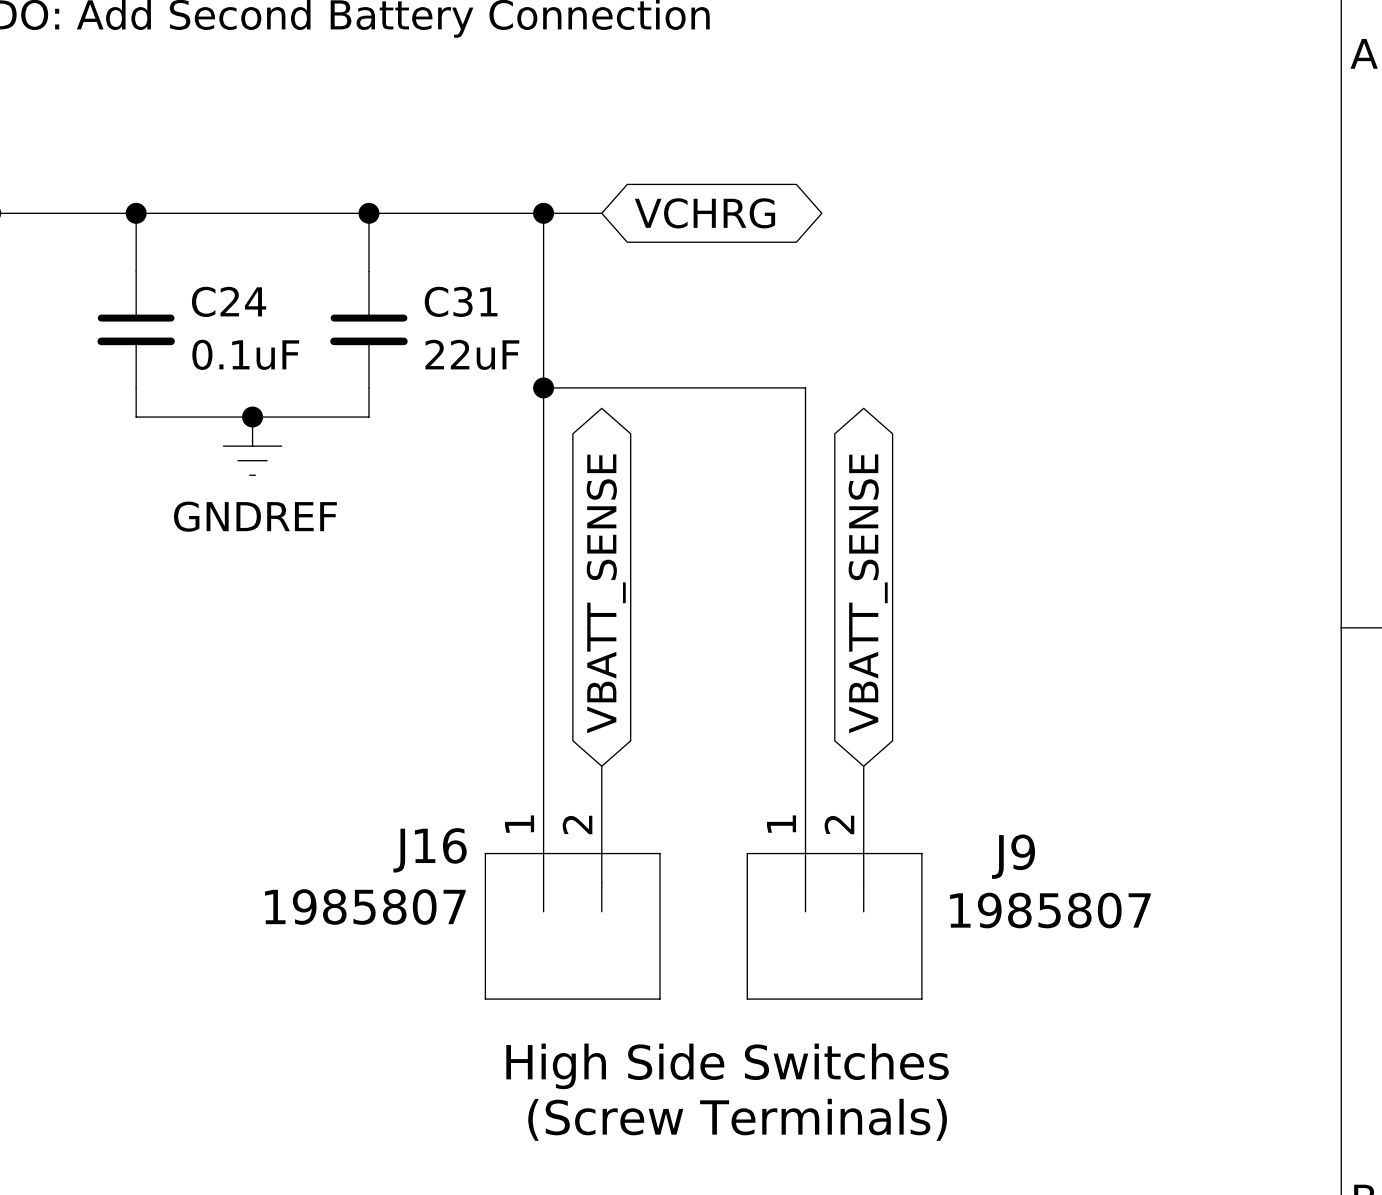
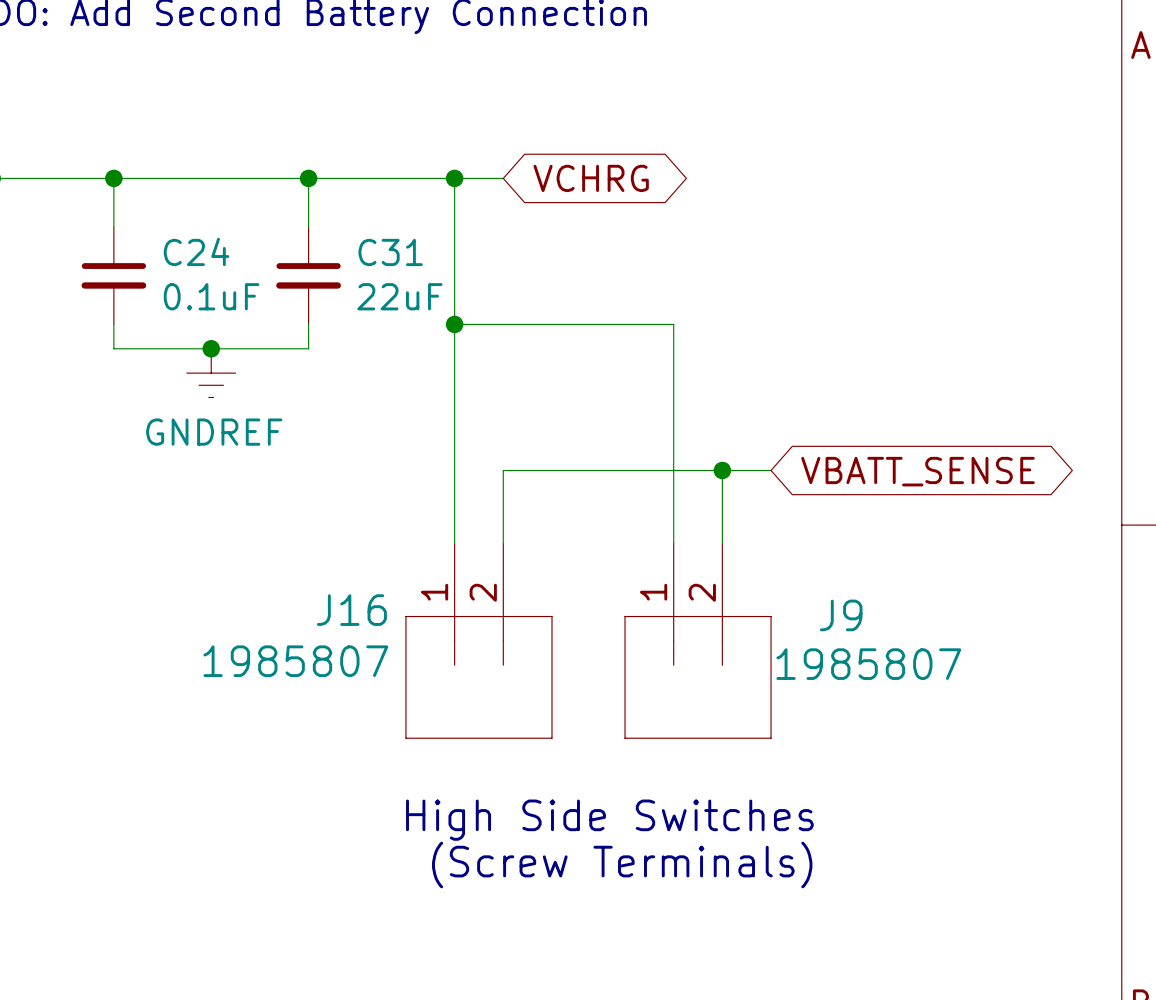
wire: none -> (722, 470) (722, 543)
junction: none -> (722, 470)
wire: none -> (771, 470) (503, 470) (503, 543)
global label: none -> VBATT_SENSE (917, 471)
global label: VBATT_SENSE (606, 593) -> none
global label: VBATT_SENSE (868, 593) -> none
J16 position: (572, 882) -> (478, 640)
J9 position: (834, 882) -> (698, 640)
text position: High Side Switches (727, 1066) -> High Side Switches (609, 820)
text position: (Screw Terminals) (737, 1119) -> (Screw Terminals) (622, 865)

